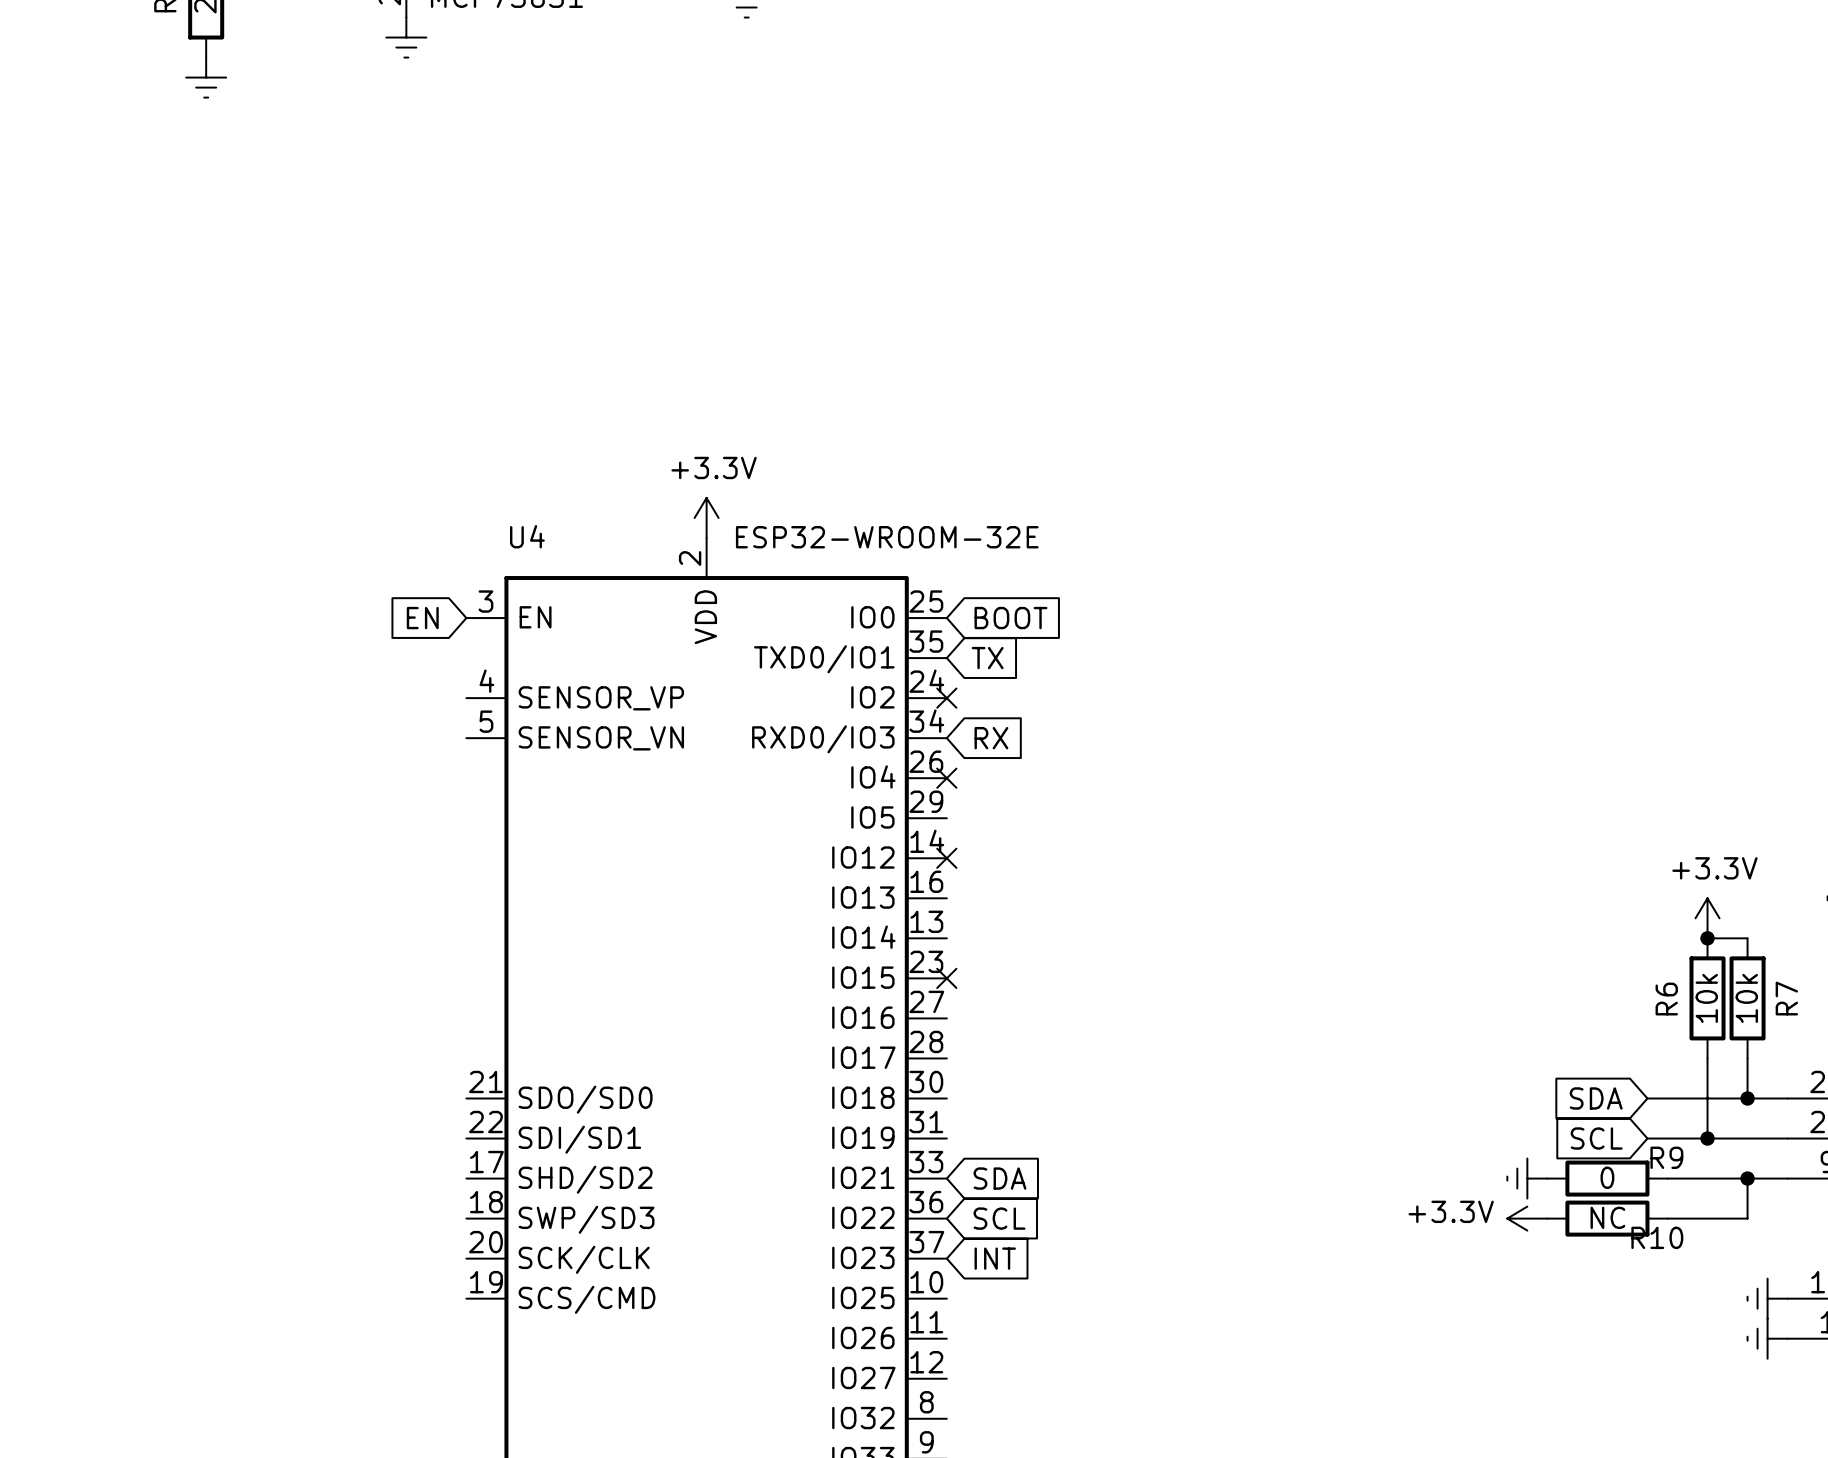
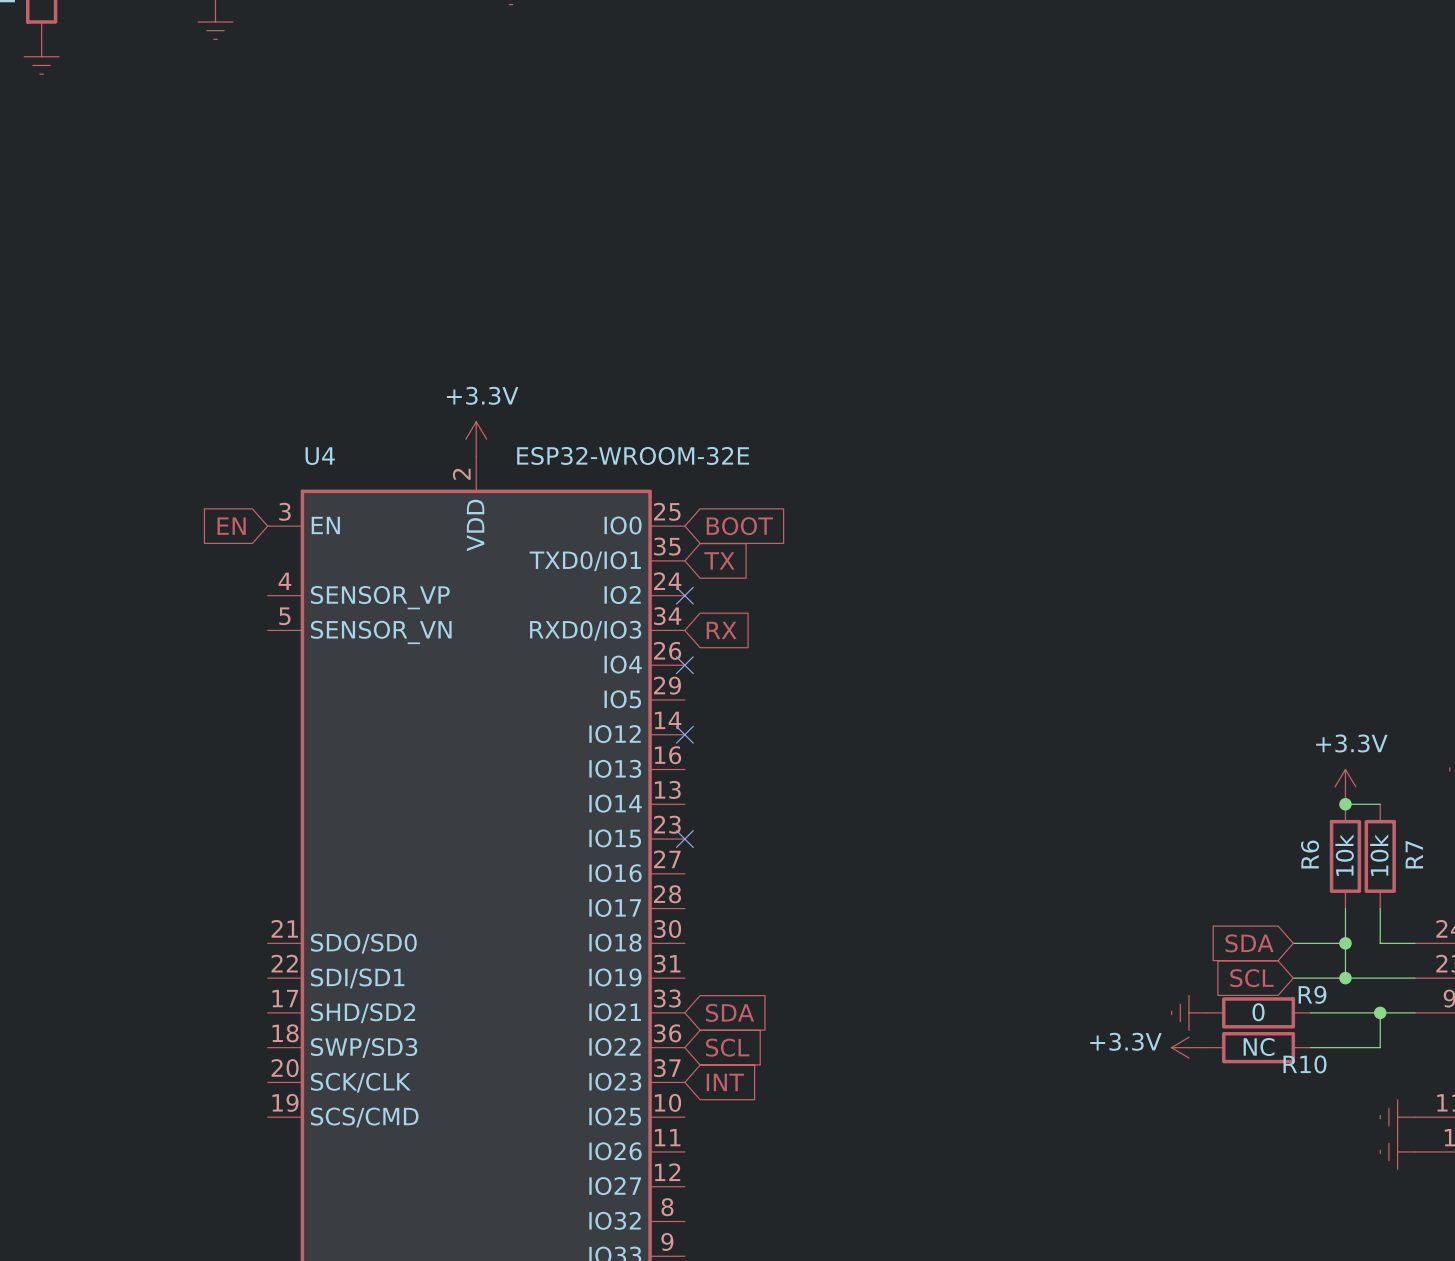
wire: (1707, 1098) (1747, 1098) -> none
junction position: (1747, 1098) -> (1345, 943)

